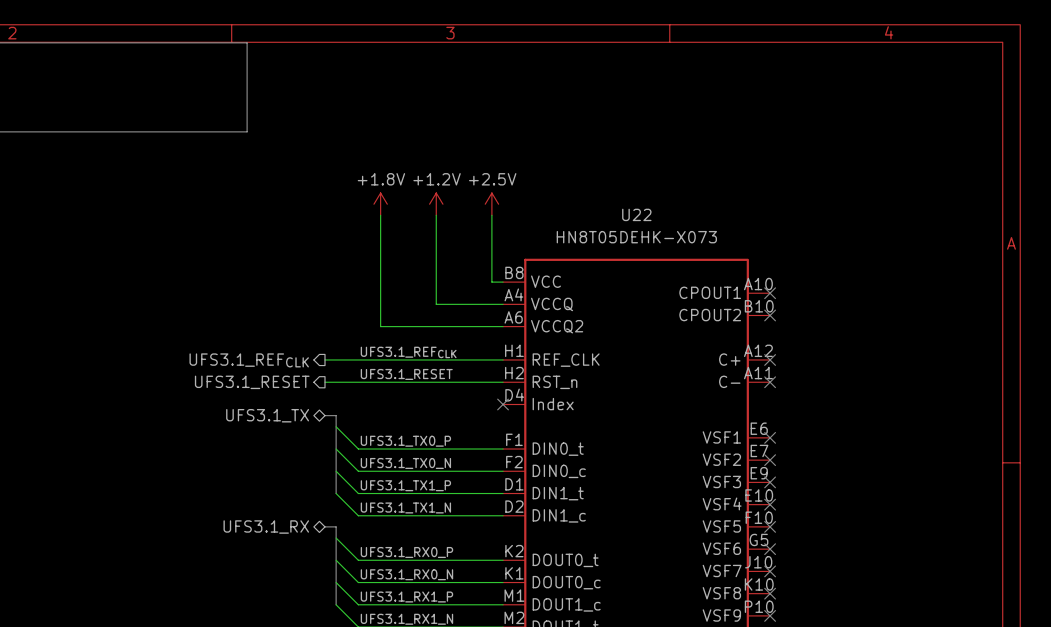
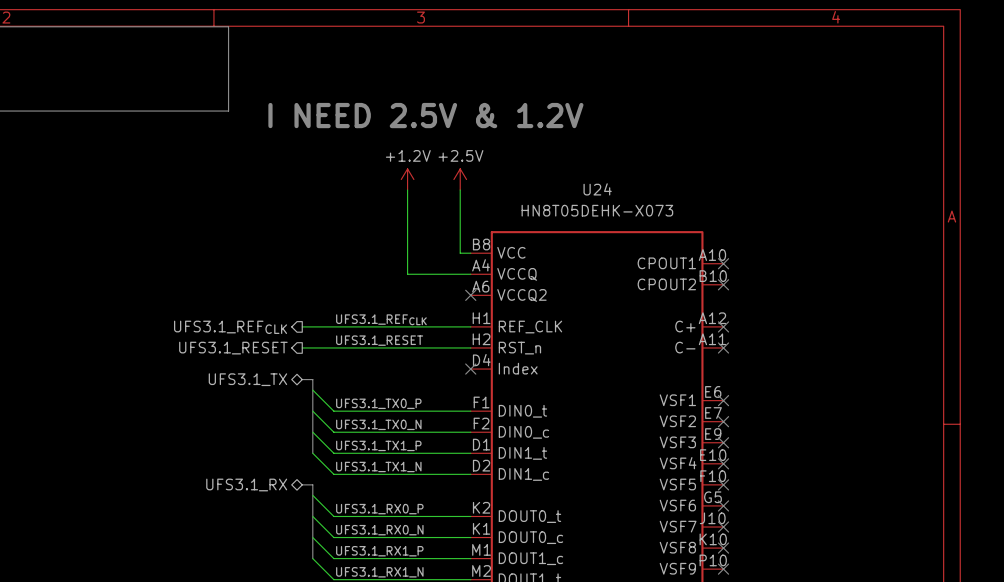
text: none -> I NEED 2.5V & 1.2V (425, 115)
power symbol: +1.8V (380, 204) -> none
U22 name: U22 (636, 214) -> U24 (597, 189)
wire: (380, 215) (380, 326) (503, 326) -> none
no-connect mark: none -> (470, 295)

